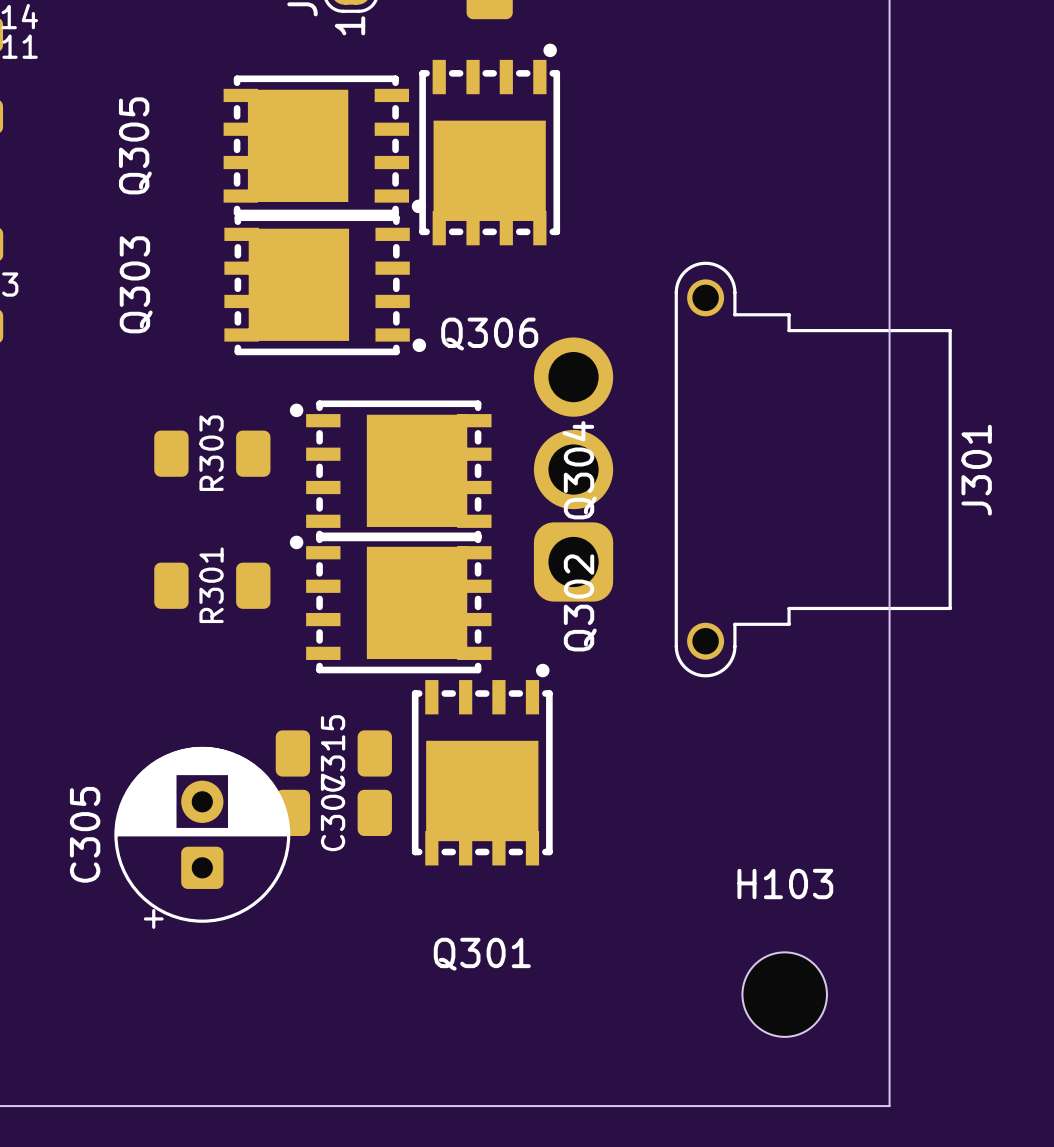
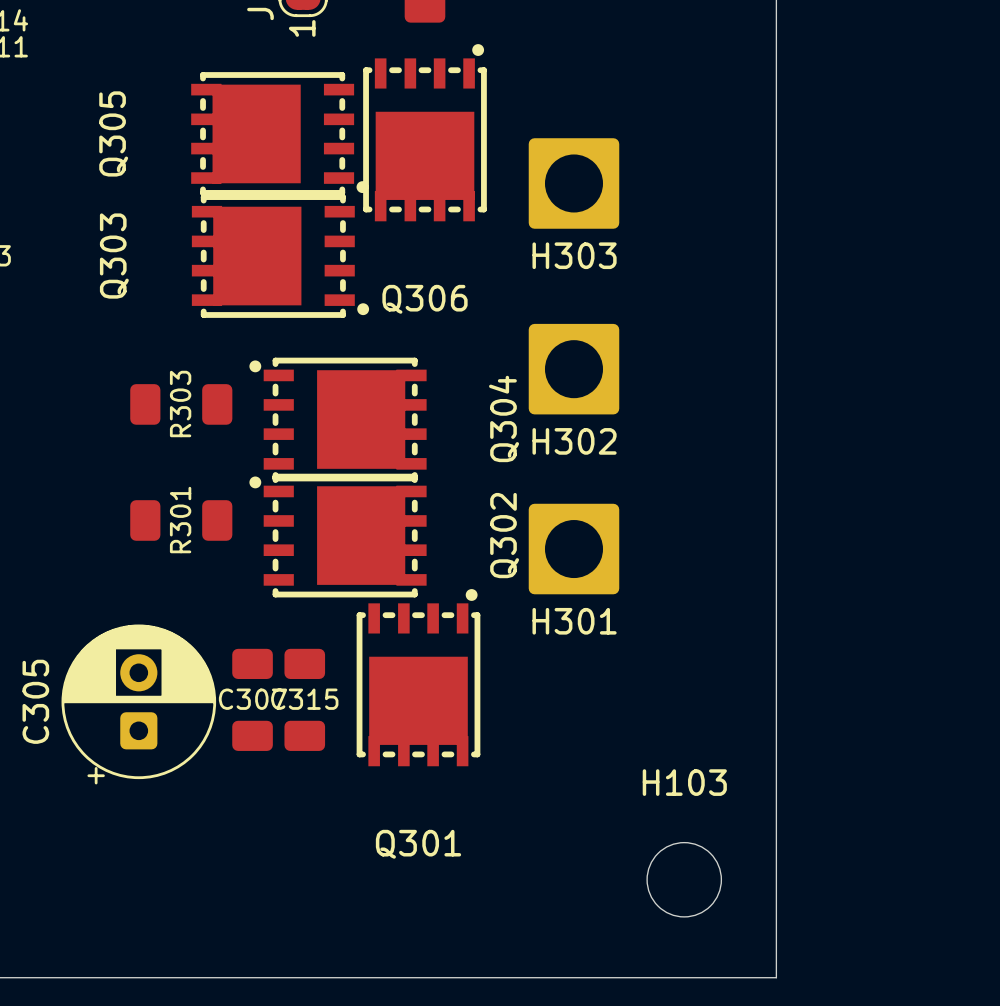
H303: none -> (573, 183)
H302: none -> (573, 369)
J301: (742, 469) -> none
H301: none -> (573, 549)
C315 rotation: 0° (333, 753) -> 90° clockwise (304, 699)
C307 rotation: 0° (333, 812) -> 90° clockwise (252, 699)
C305 position: (202, 837) -> (138, 704)

